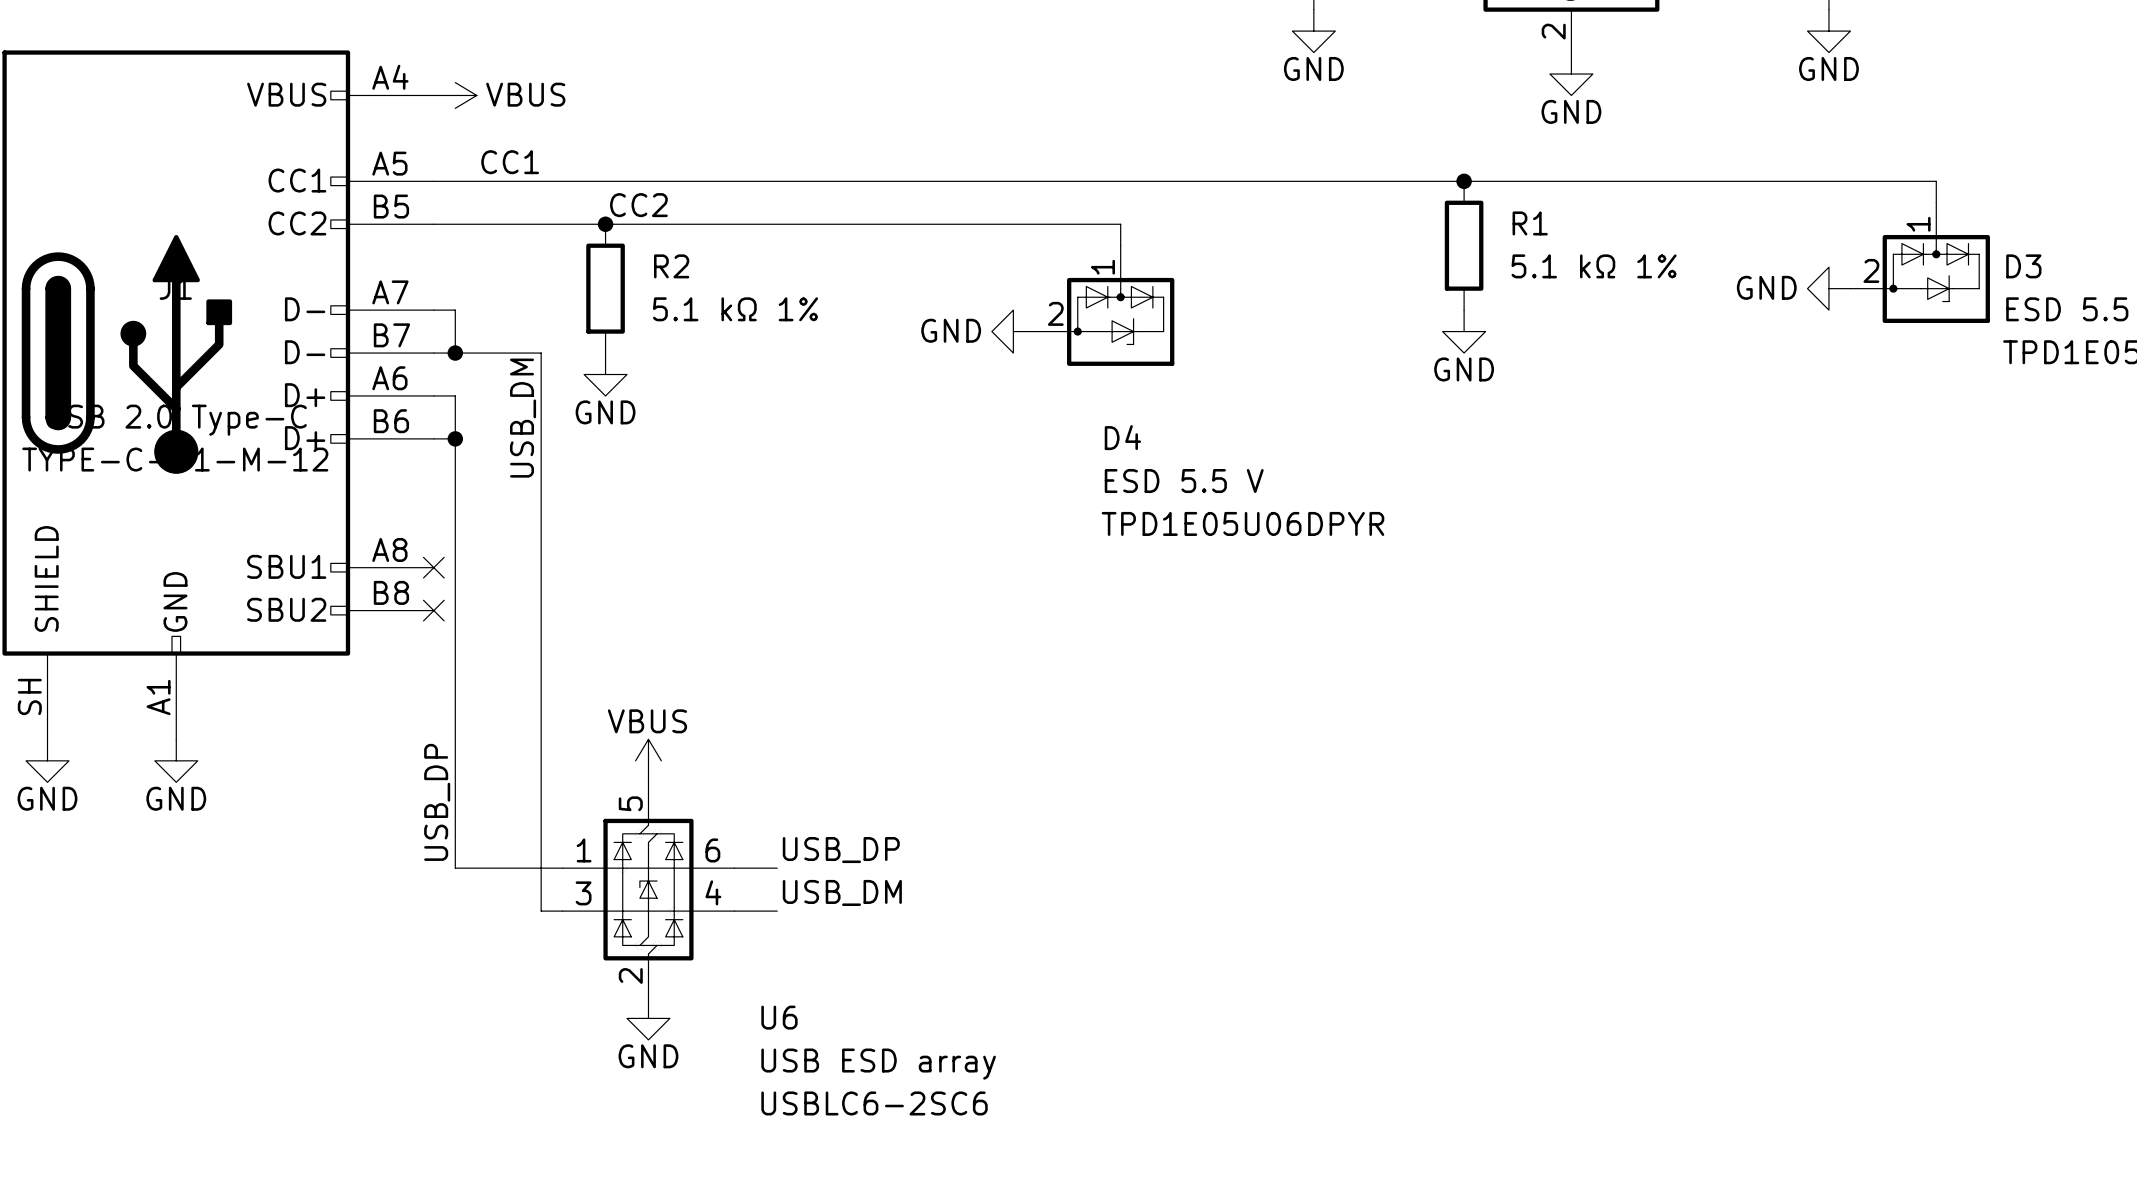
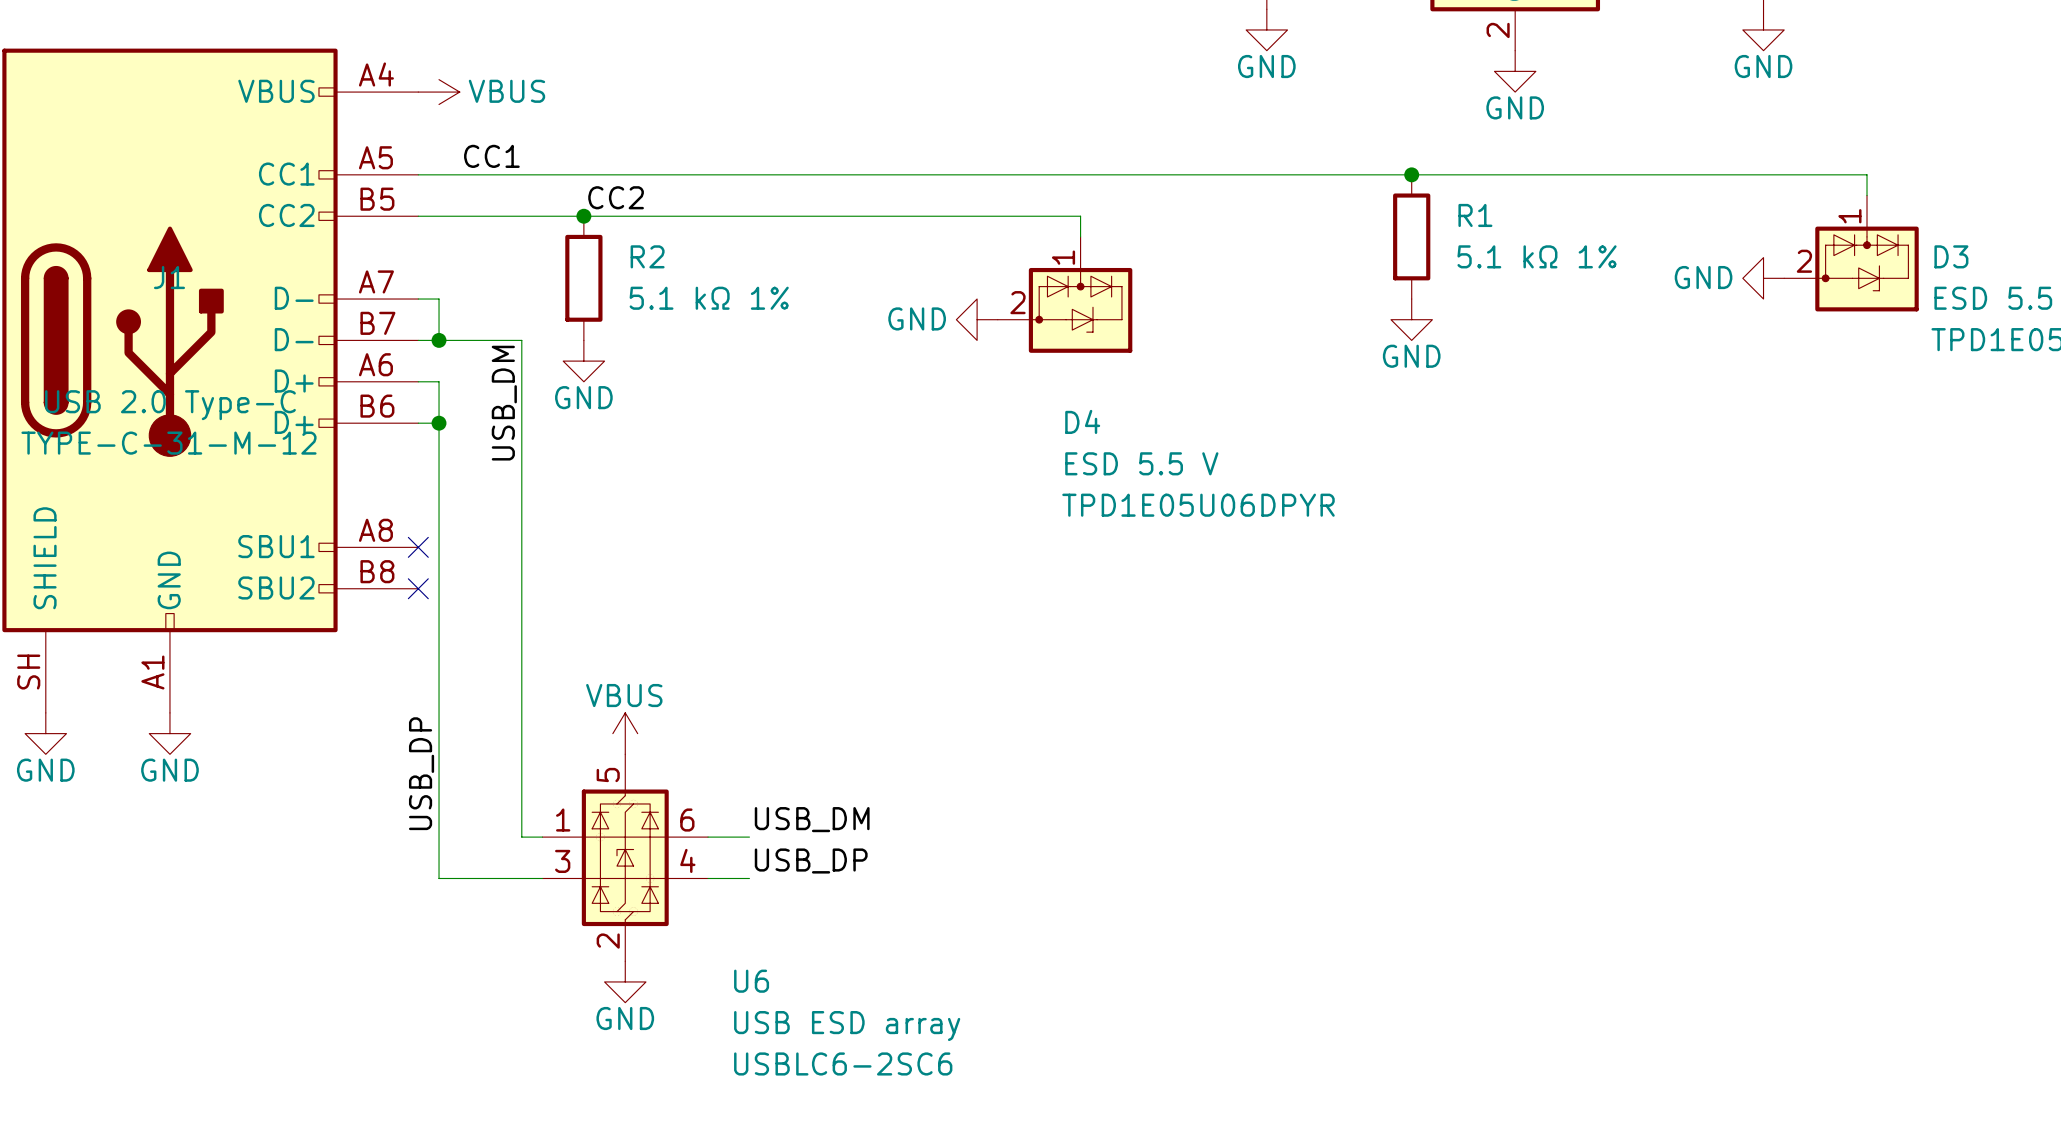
label: USB_DP (841, 850) -> USB_DM (812, 819)
wire: (455, 868) (541, 868) (541, 911) -> (439, 837) (439, 878) (521, 878)
label: USB_DM (842, 892) -> USB_DP (811, 861)

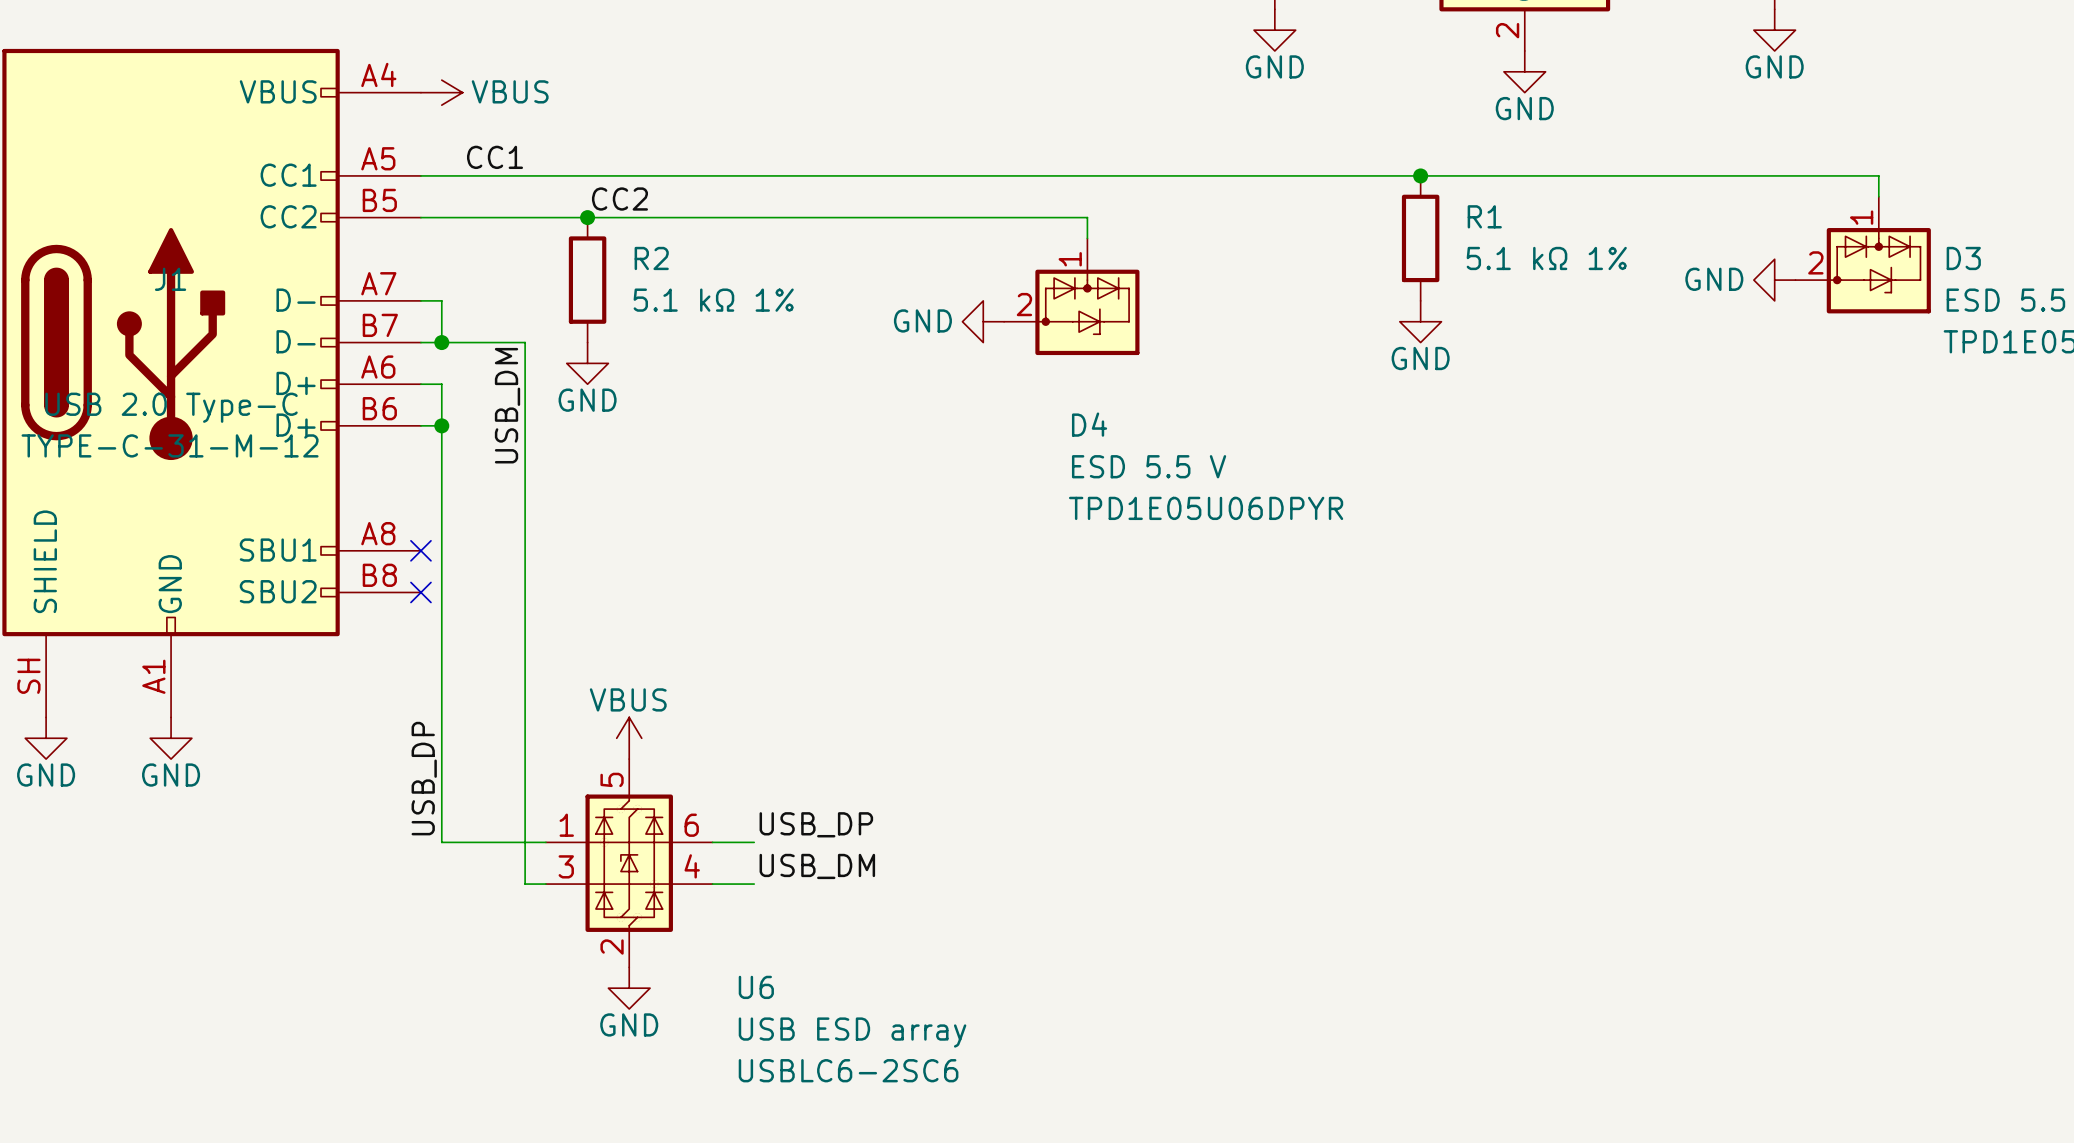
label: USB_DM (812, 819) -> USB_DP (816, 824)
wire: (439, 837) (439, 878) (521, 878) -> (441, 842) (525, 842) (525, 884)
label: USB_DP (811, 861) -> USB_DM (817, 866)

